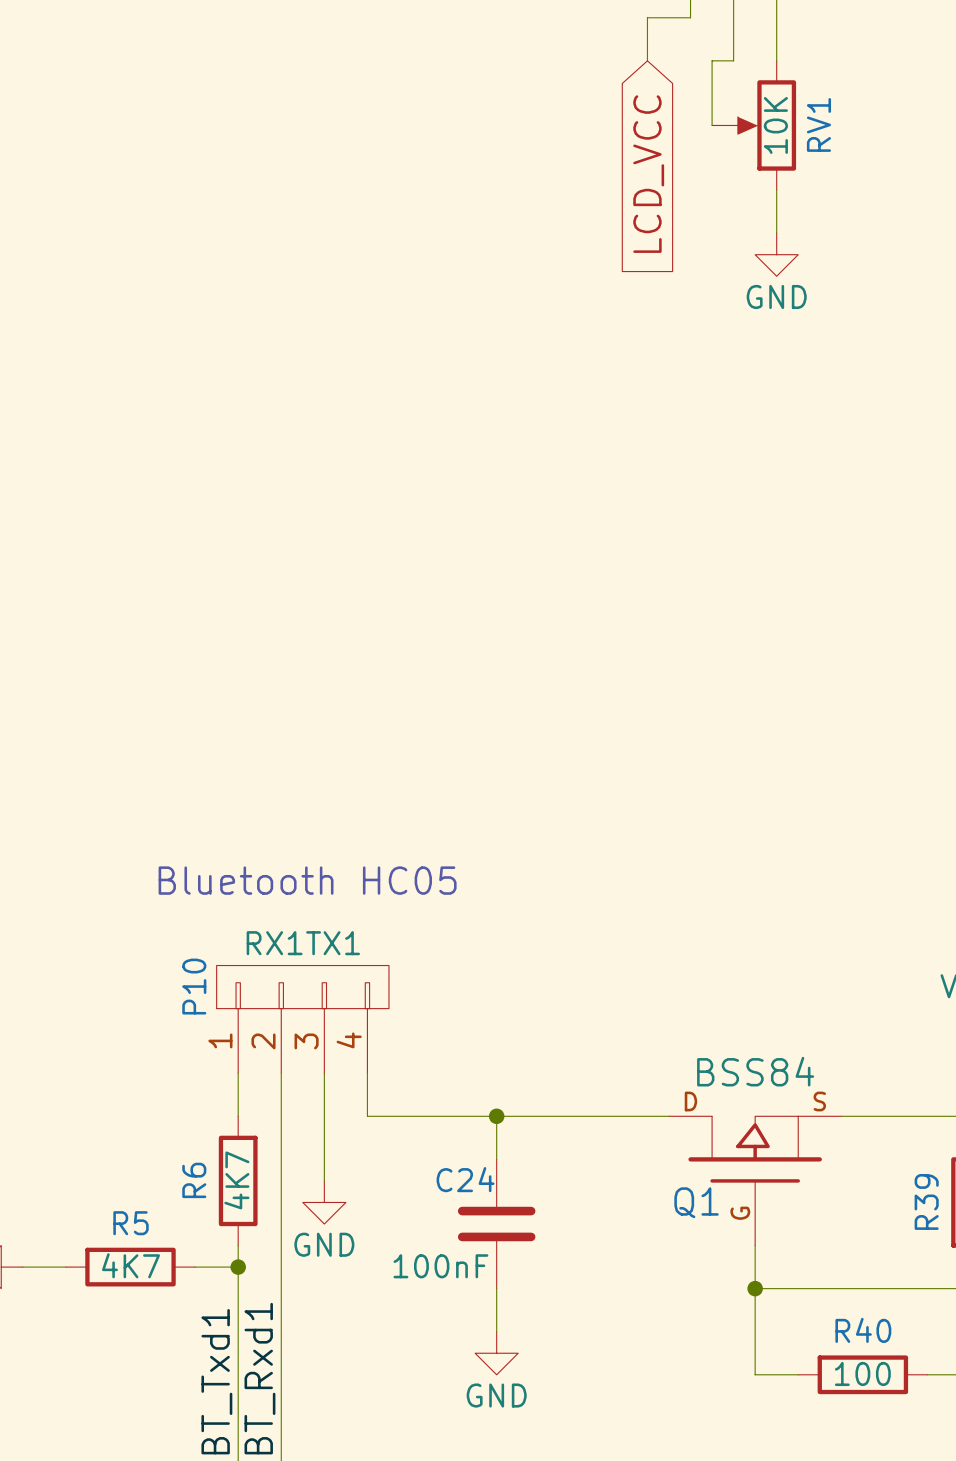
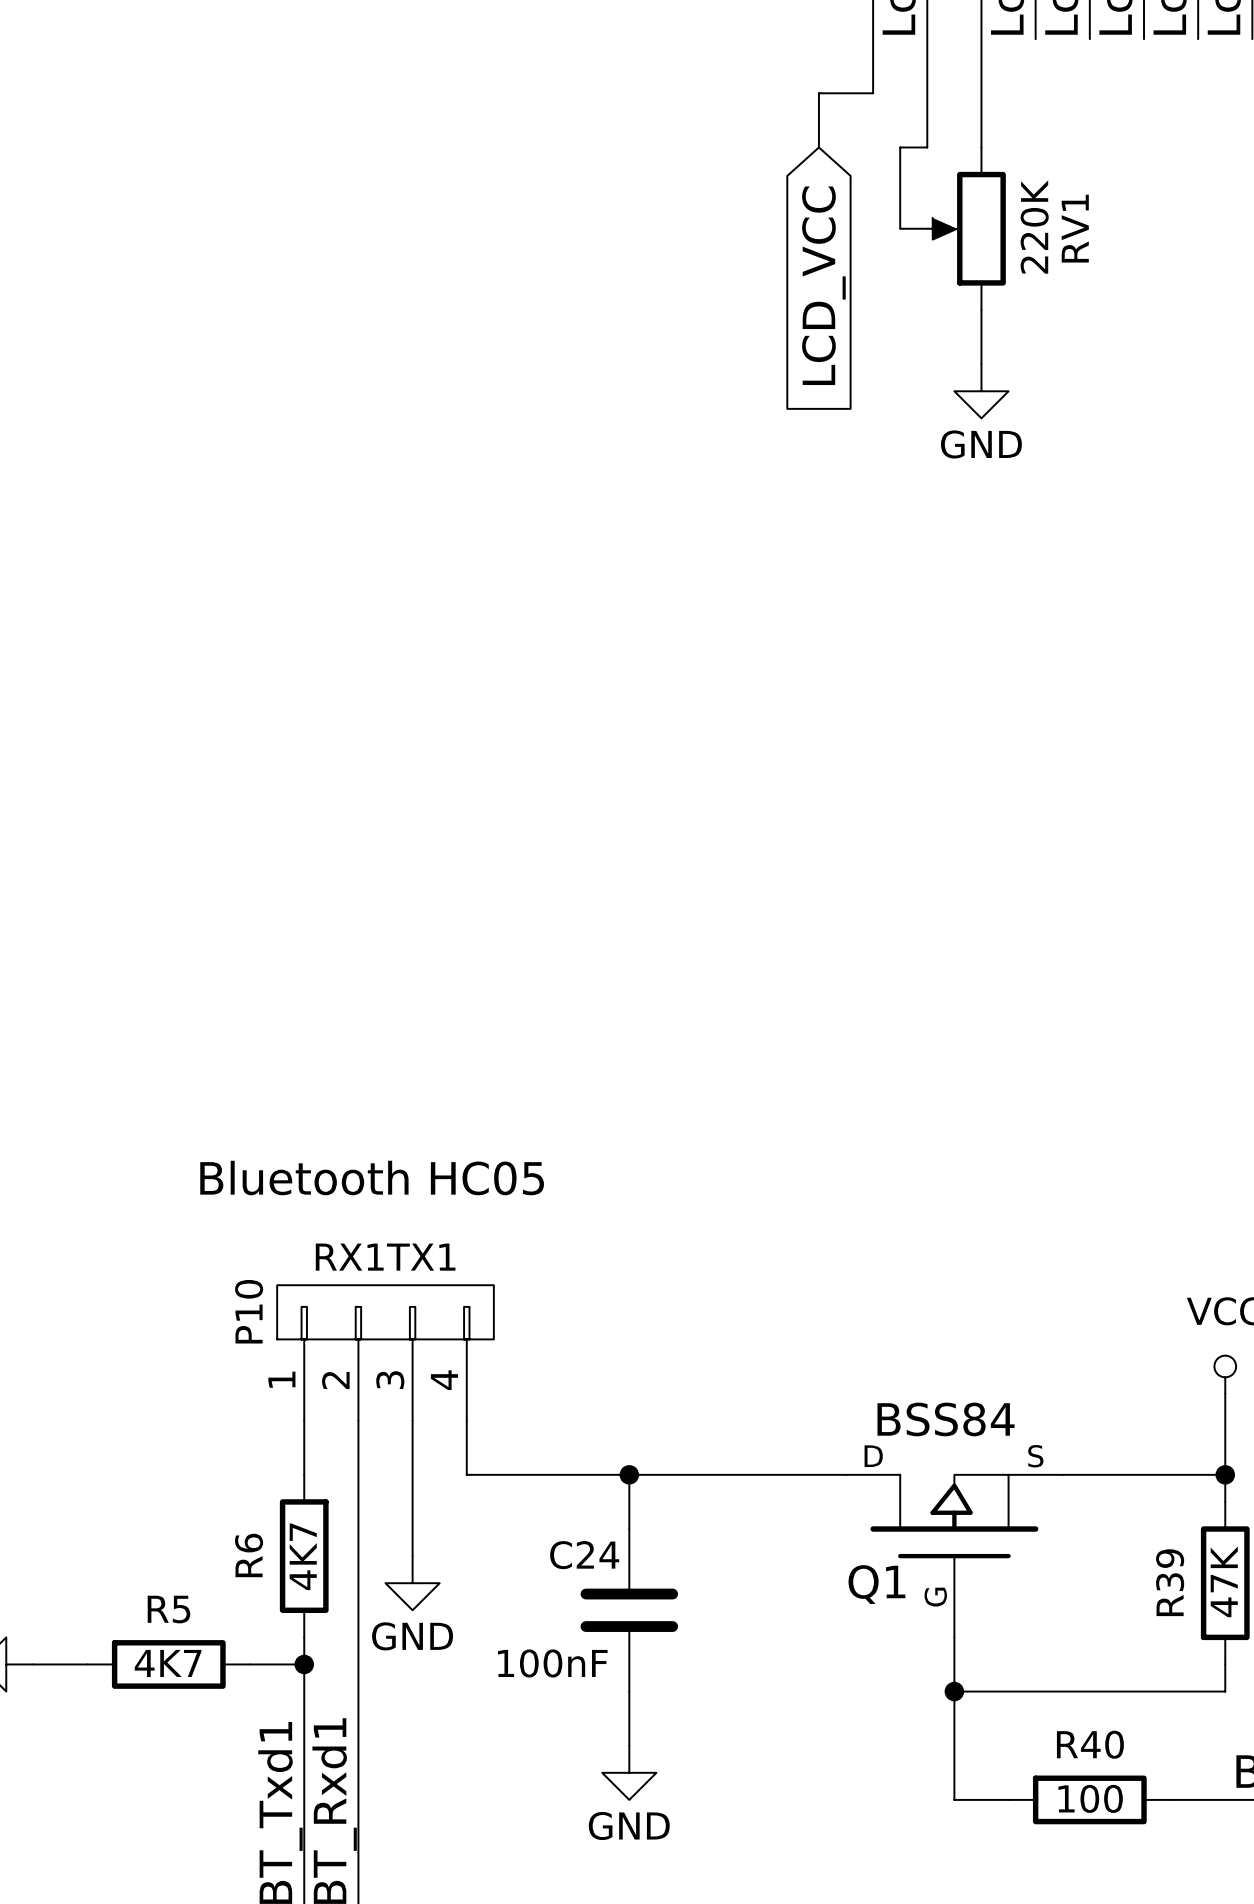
RV1 name position: RV1 (818, 124) -> RV1 (1075, 228)
RV1 value: 10K (775, 125) -> 220K (1034, 227)

